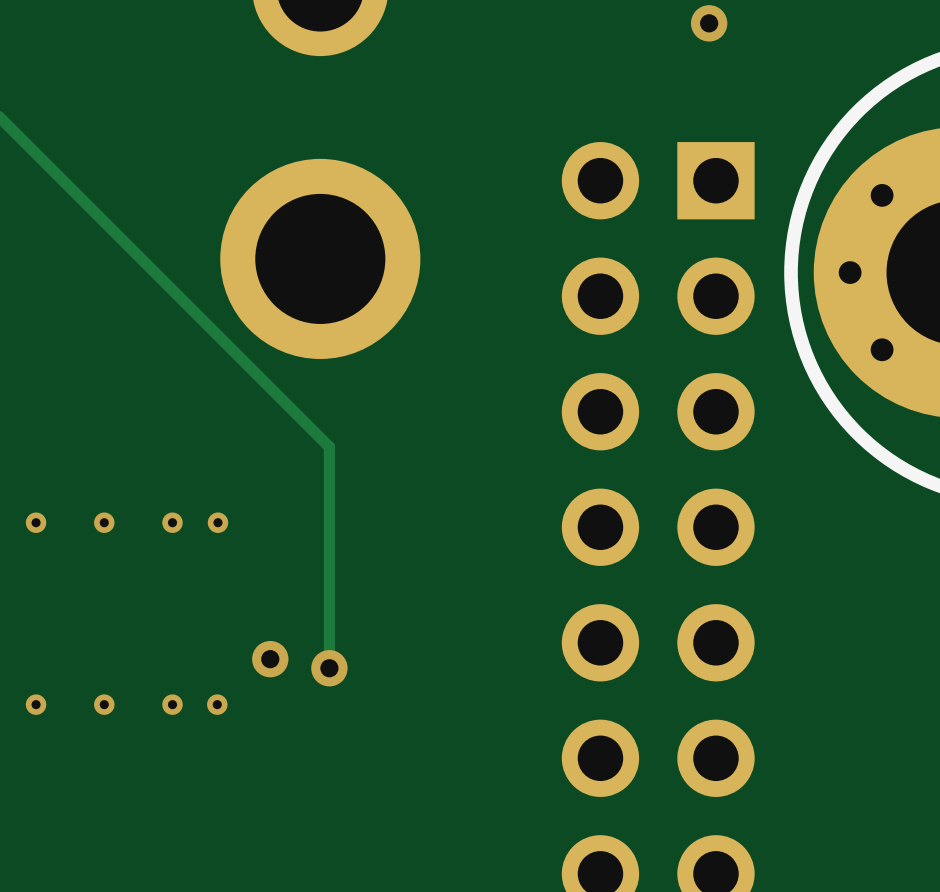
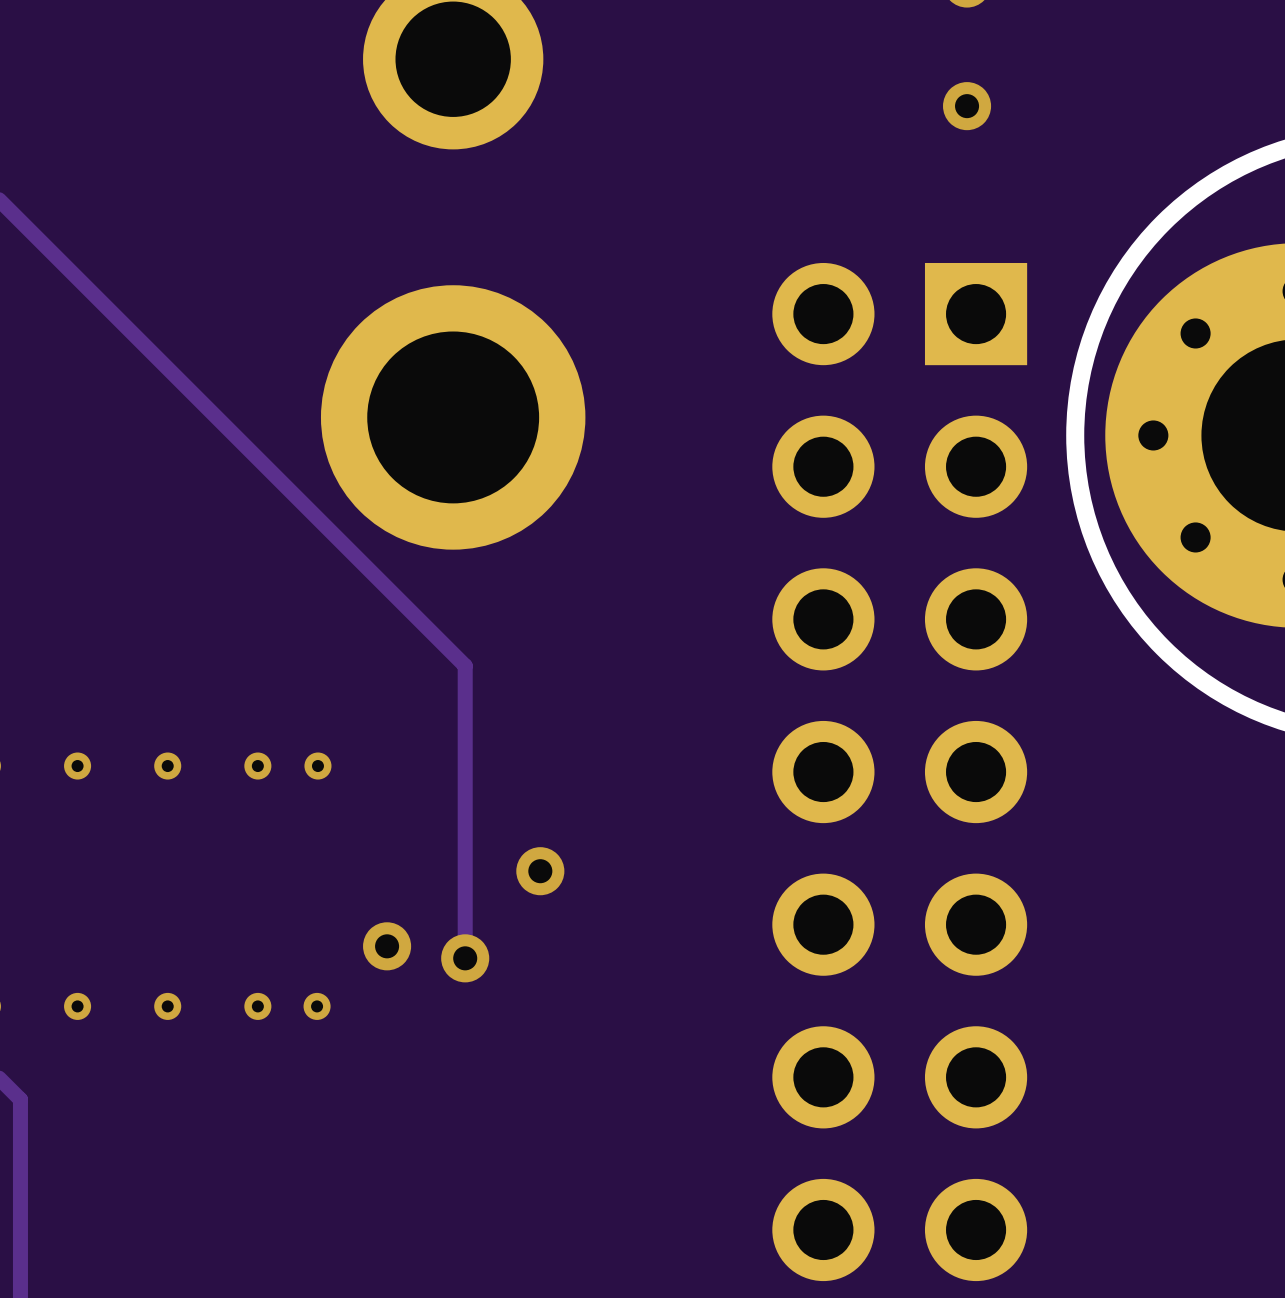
via: none -> (540, 871)

